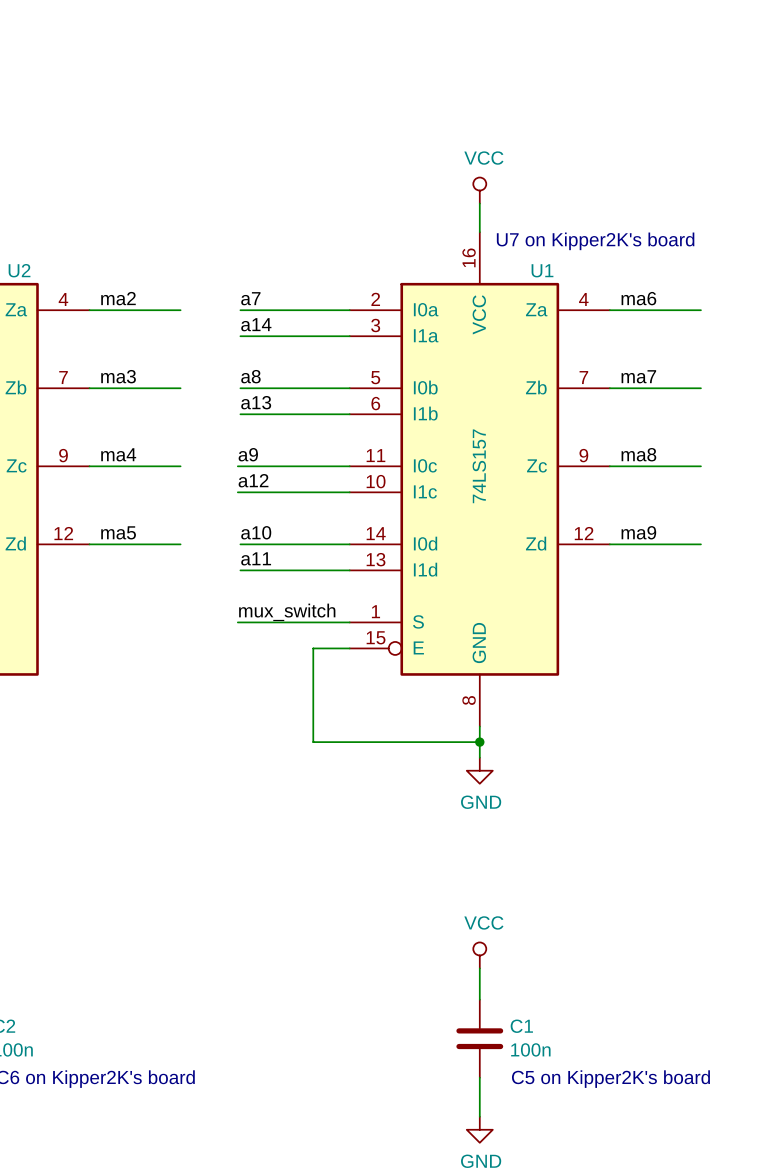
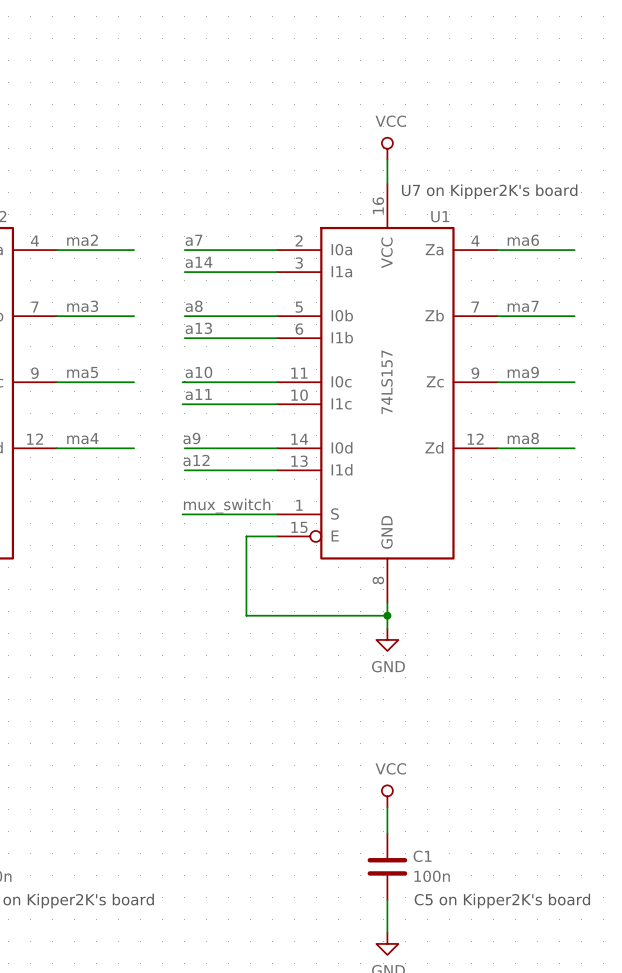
label: ma4 (118, 454) -> ma5 (82, 372)
label position: a9 (248, 454) -> a9 (191, 438)
label: ma8 (638, 454) -> ma9 (523, 372)
label position: a12 (253, 480) -> a12 (196, 460)
label: ma5 (118, 532) -> ma4 (82, 438)
label position: a10 (256, 532) -> a10 (198, 372)
label: ma9 (638, 532) -> ma8 (523, 438)
label position: a11 (256, 558) -> a11 (198, 394)

